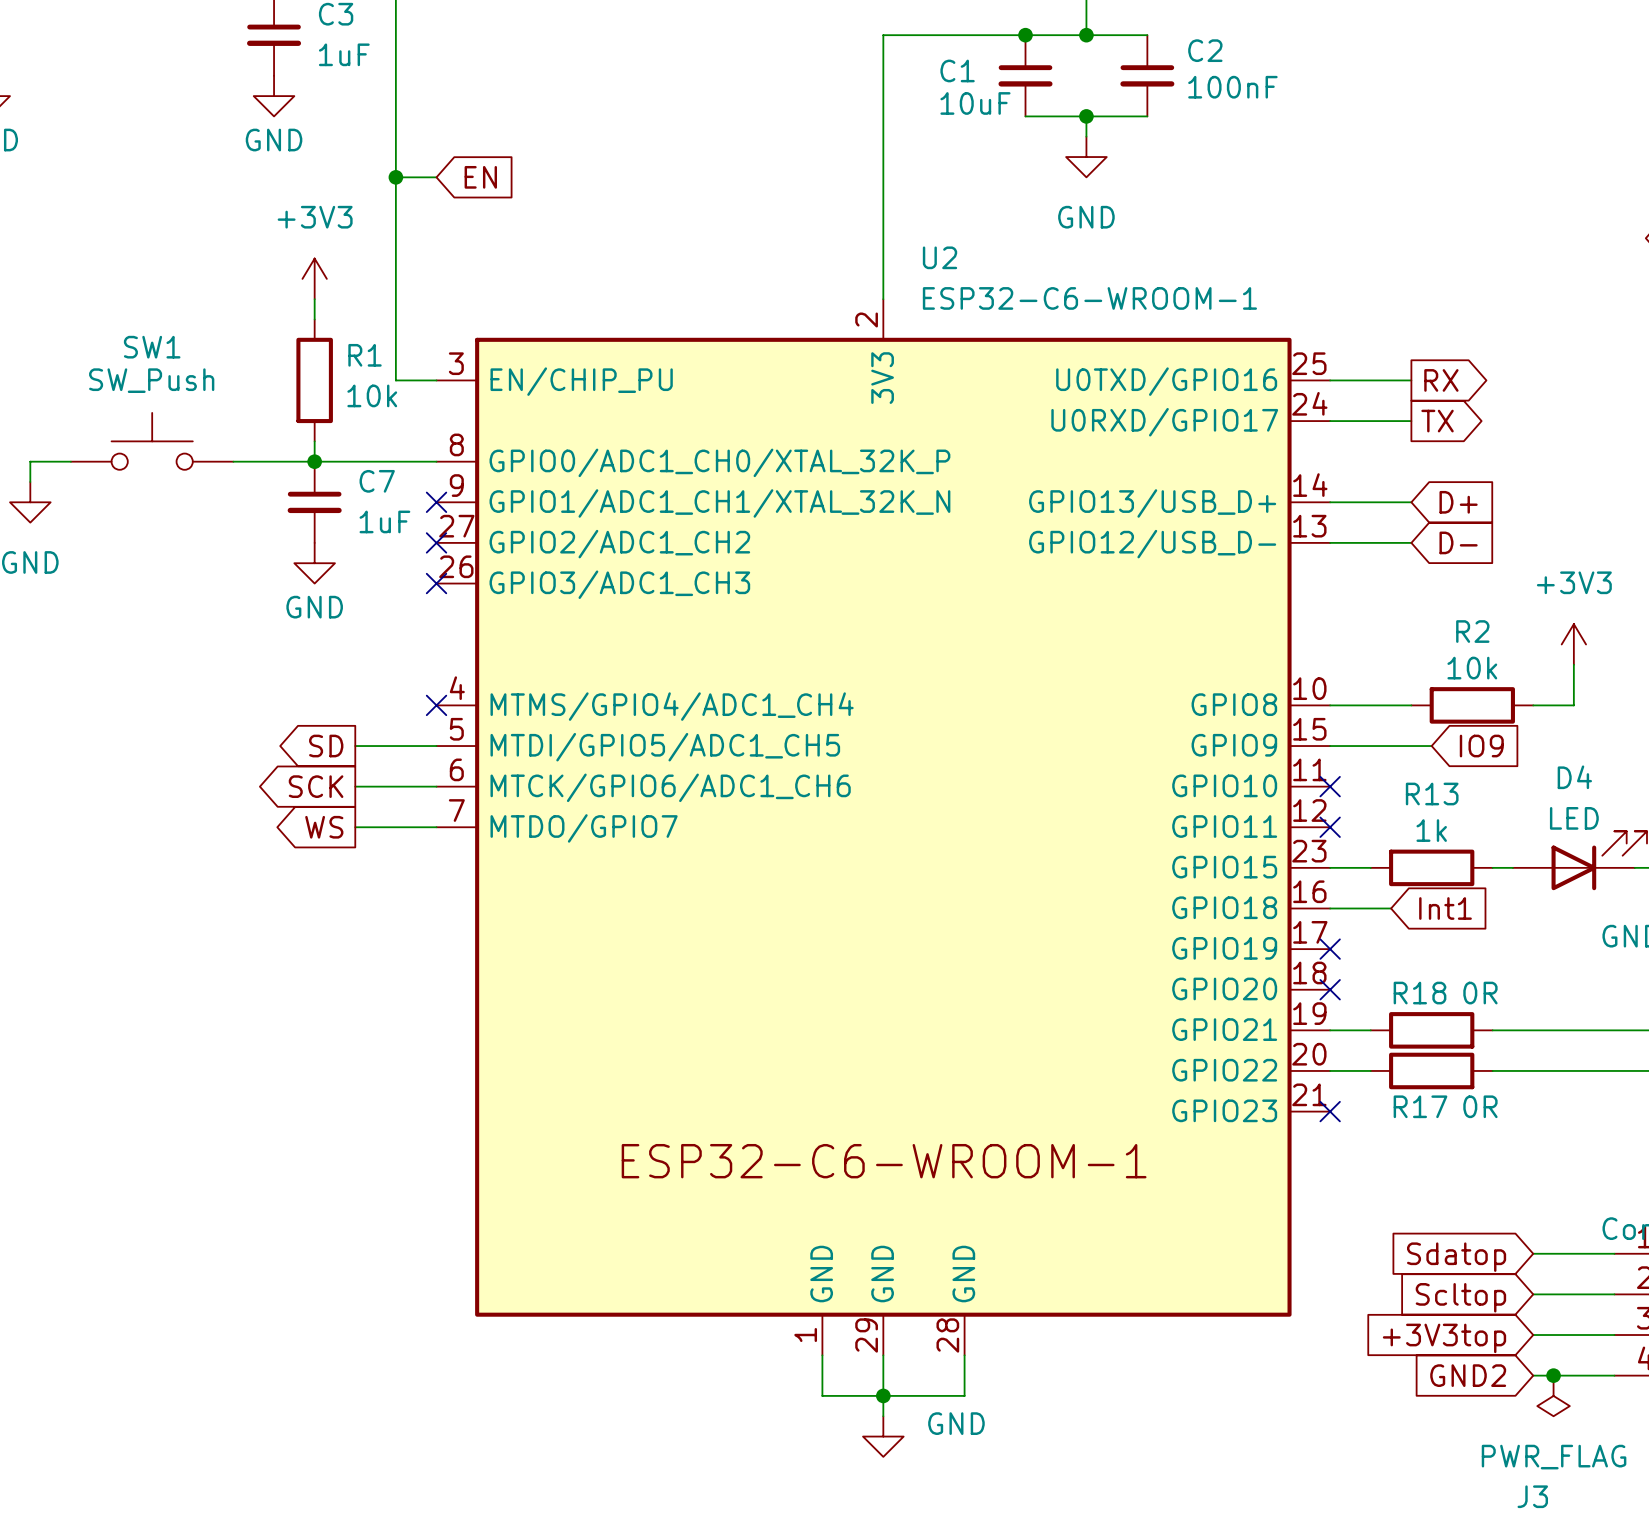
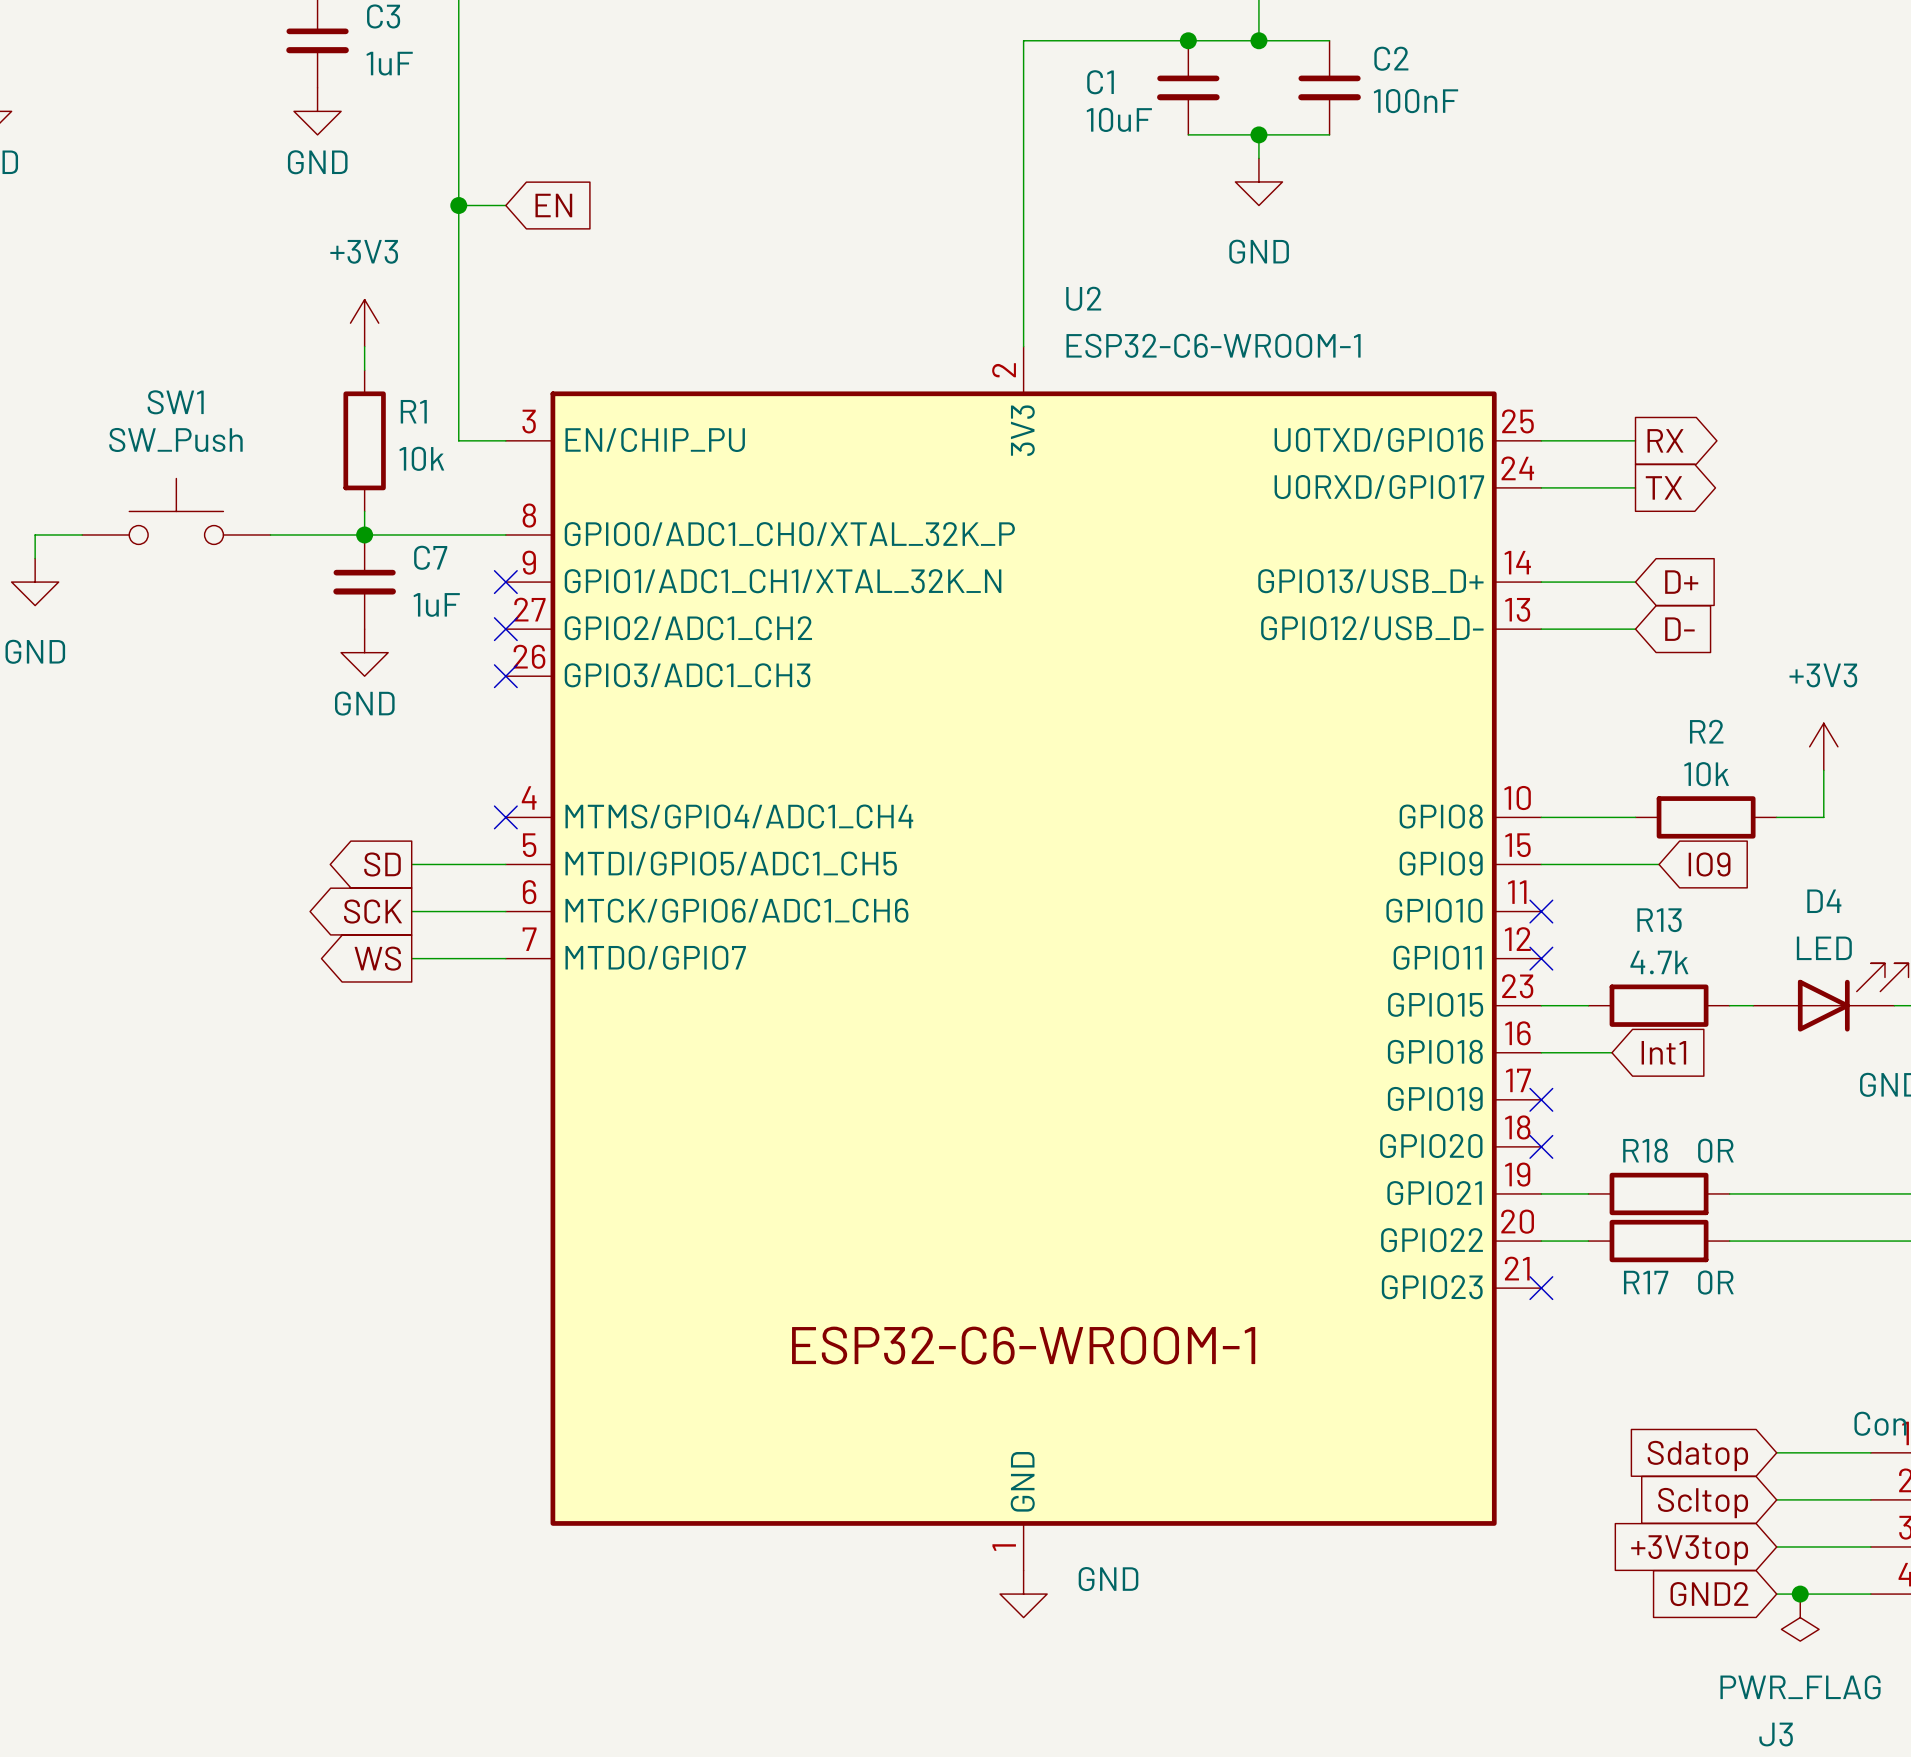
U2 symbol: [436, 299, 1331, 1356] -> [505, 346, 1542, 1571]
R13 value: 1k (1431, 830) -> 4.7k (1659, 962)
wire: (822, 1355) (822, 1395) (964, 1395) (964, 1355) -> none
wire: (883, 1355) (883, 1416) -> none
junction: (883, 1395) -> none
power symbol position: GND (883, 1436) -> GND (1023, 1594)

